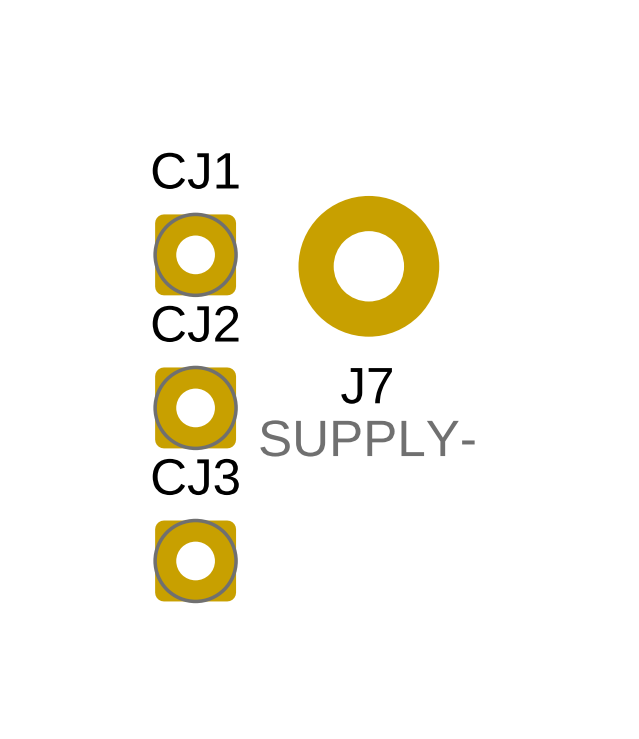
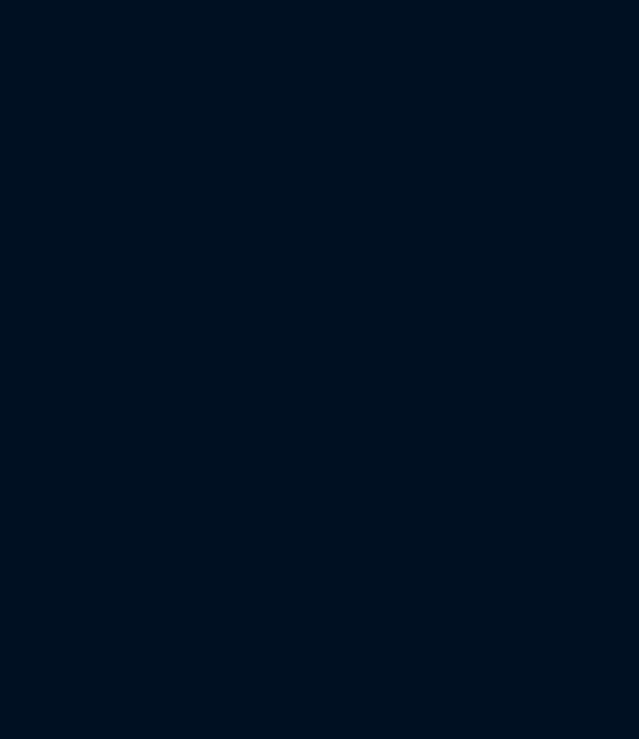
CJ1: (195, 254) -> none
J7: SUPPLY- (368, 266) -> none
CJ2: (195, 407) -> none
CJ3: (195, 560) -> none

